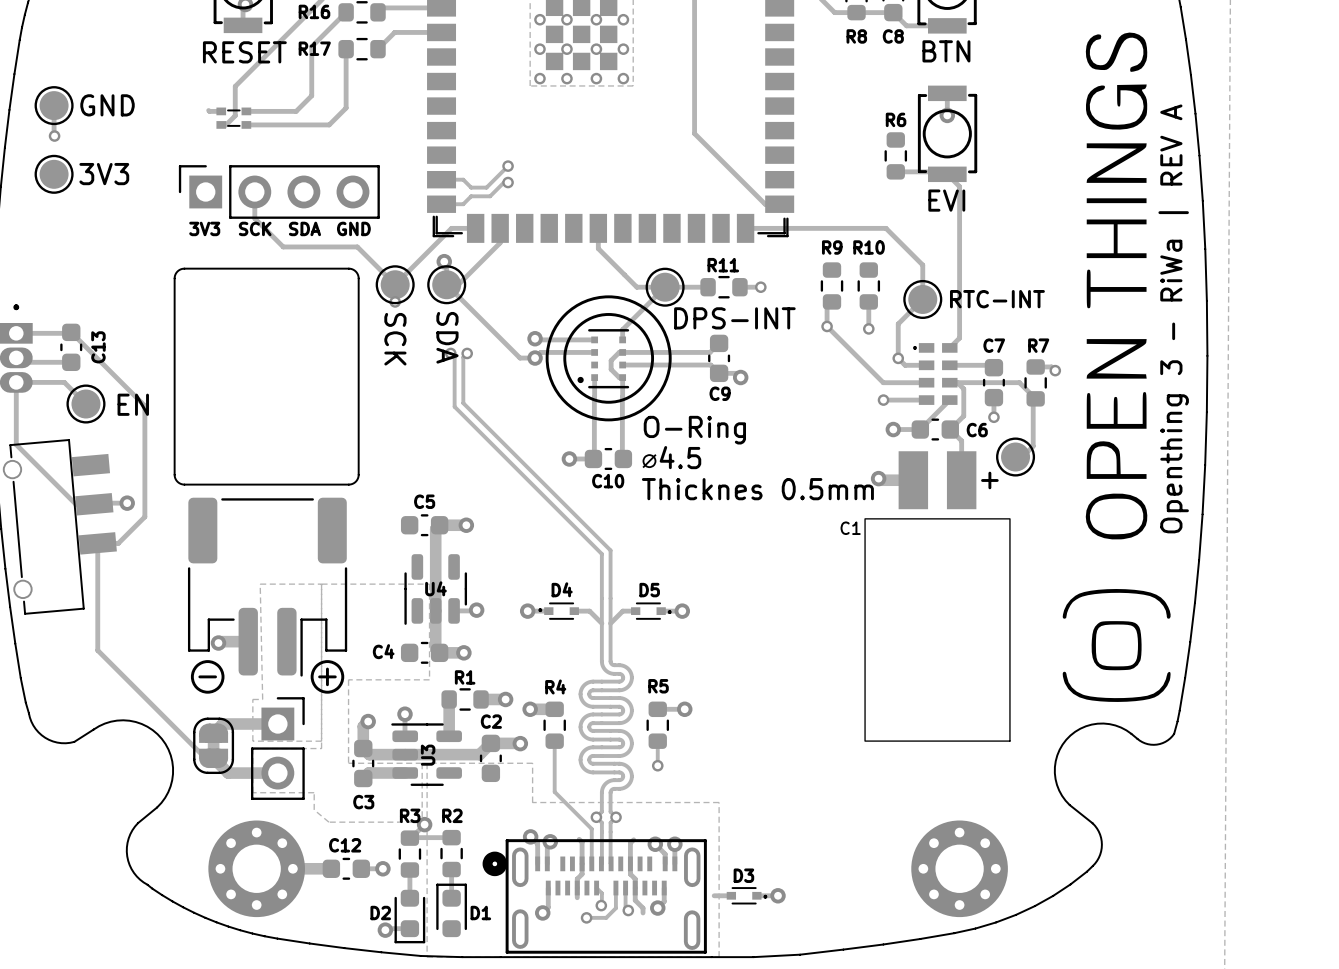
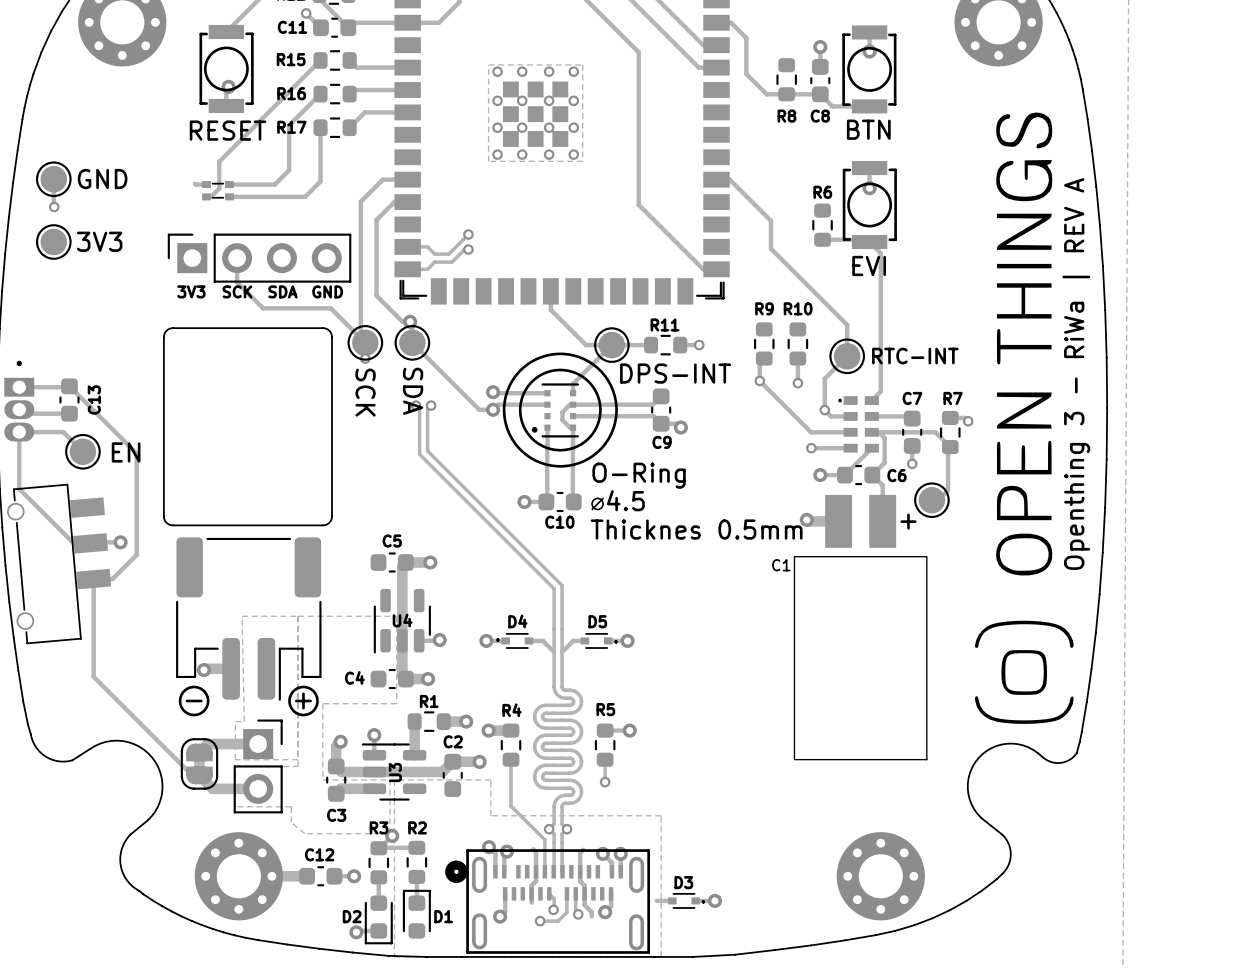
track: none -> (407, 179) (382, 179) (360, 201) (360, 338)
track: none -> (407, 202) (394, 202) (376, 219) (376, 295) (402, 321) (410, 321)
track: (475, 228) (451, 228) (395, 284) -> none
track: (500, 228) (500, 242) (458, 284) -> none
track: (745, 228) (886, 228) -> (716, 179) (729, 179) (770, 220) (770, 248) (813, 291)

